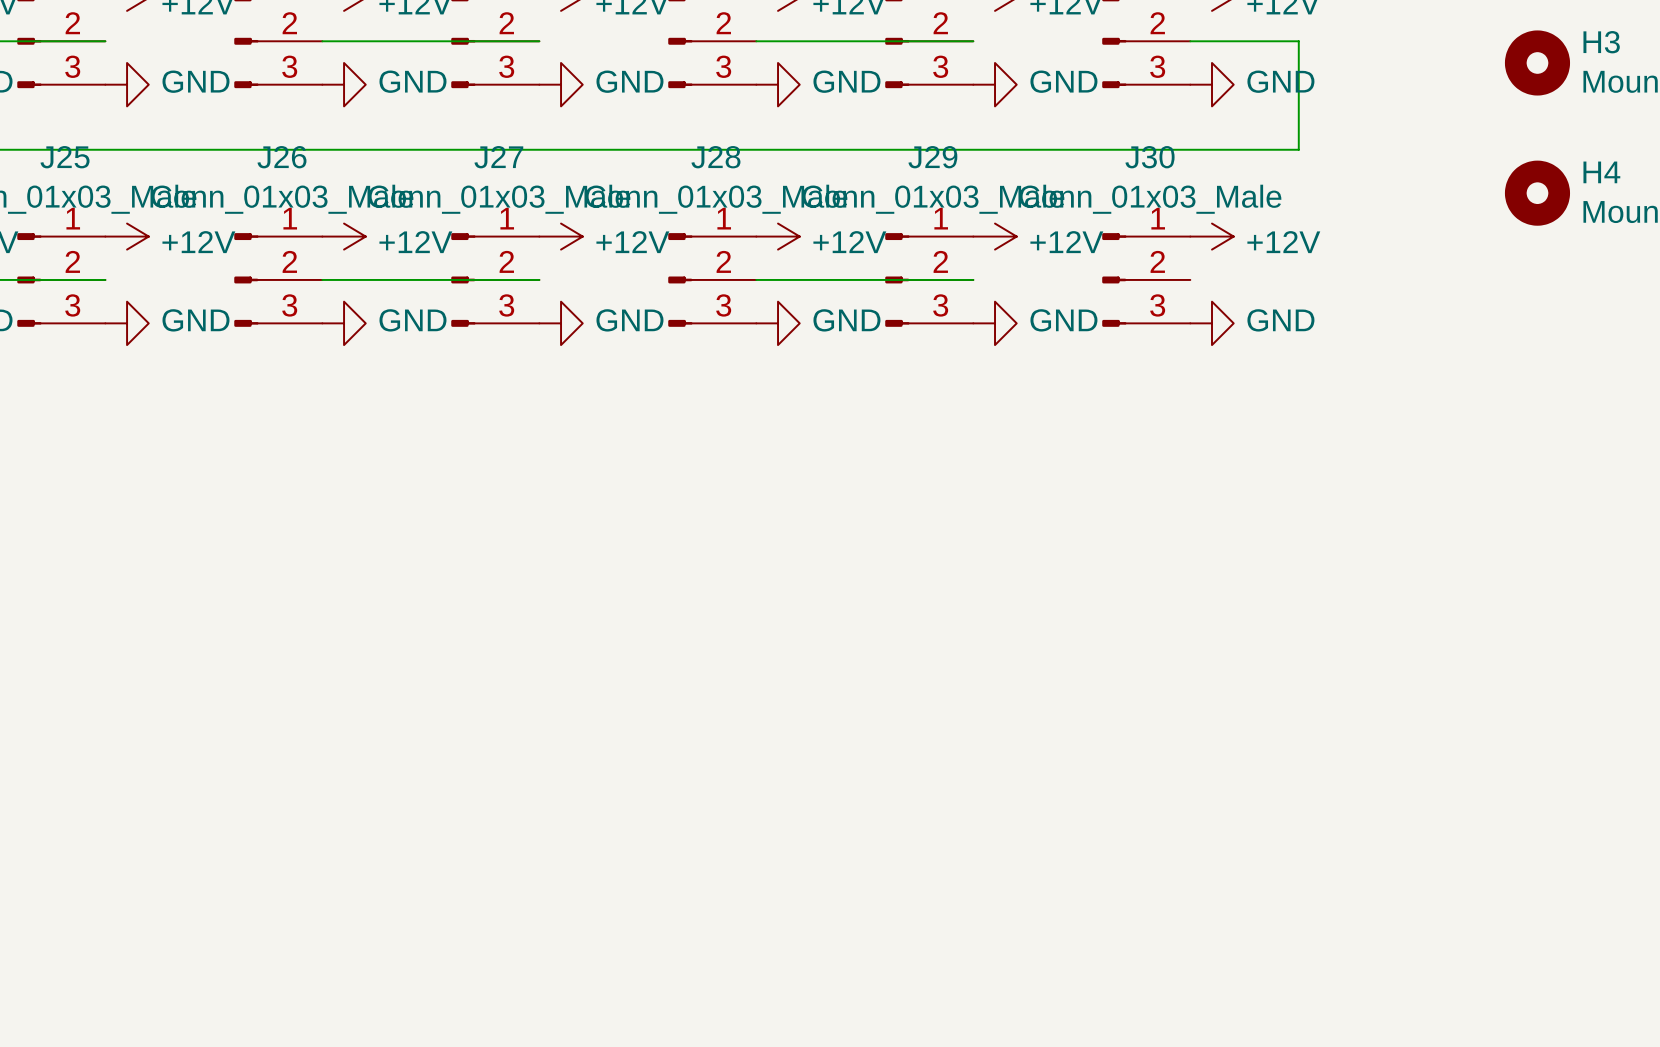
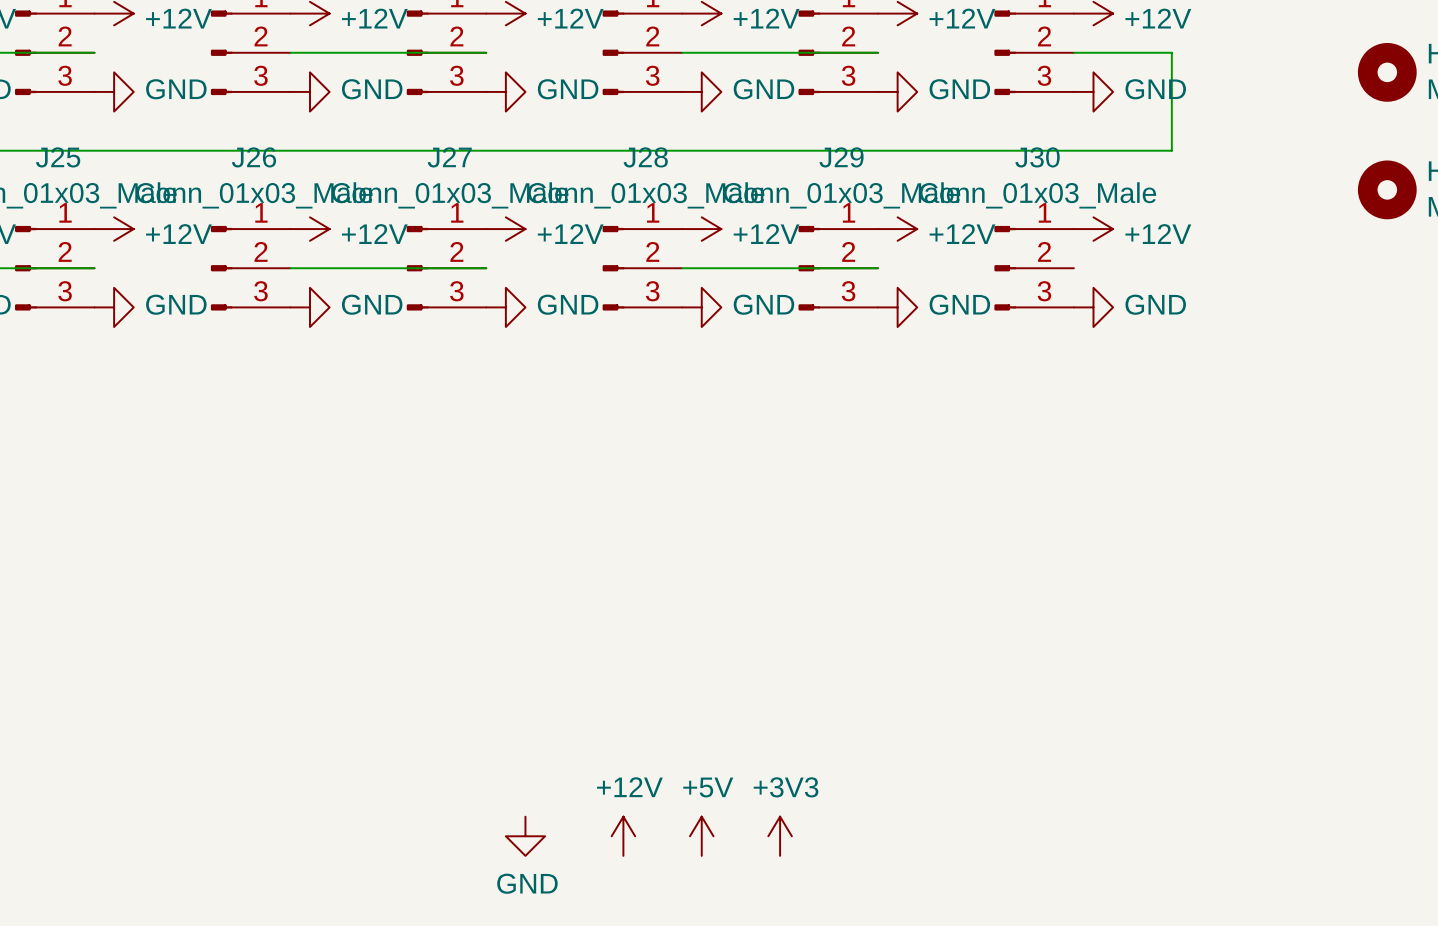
power symbol: none -> GND (525, 836)
power symbol: none -> +12V (623, 836)
power symbol: none -> +5V (701, 836)
power symbol: none -> +3V3 (780, 836)

